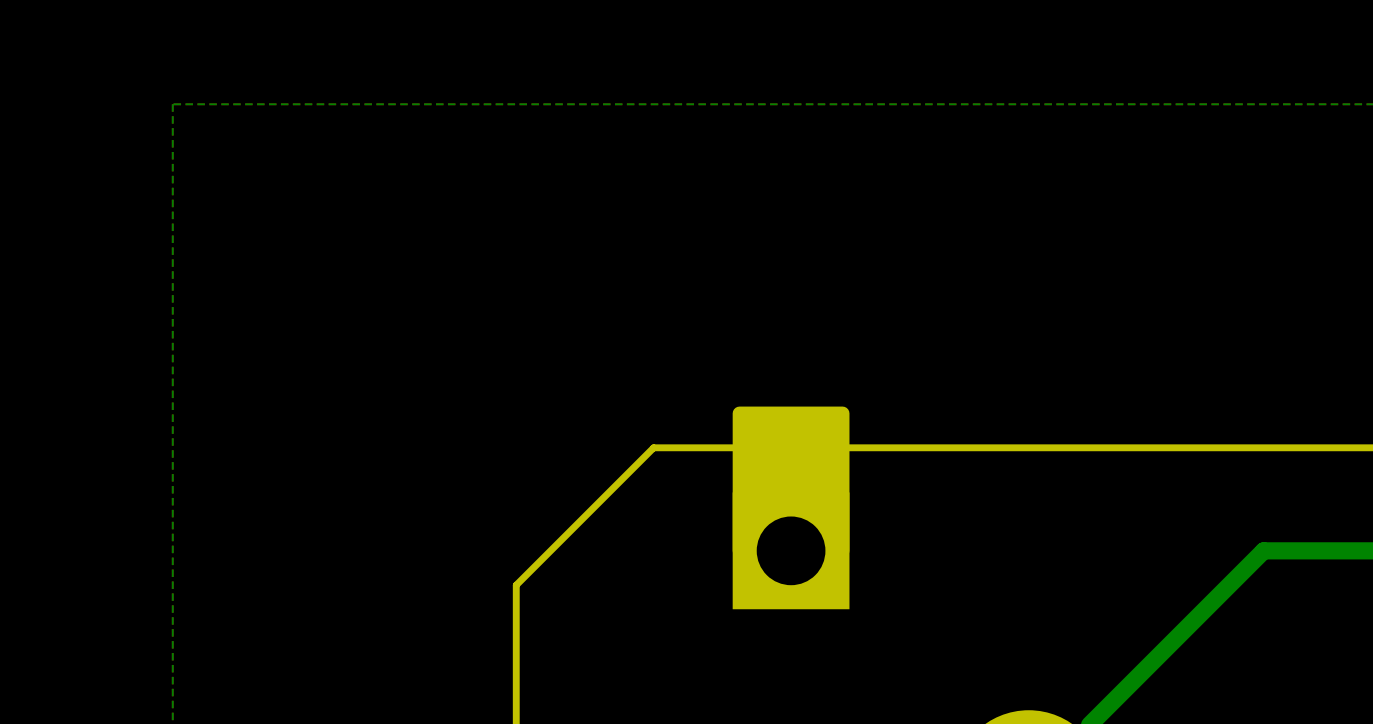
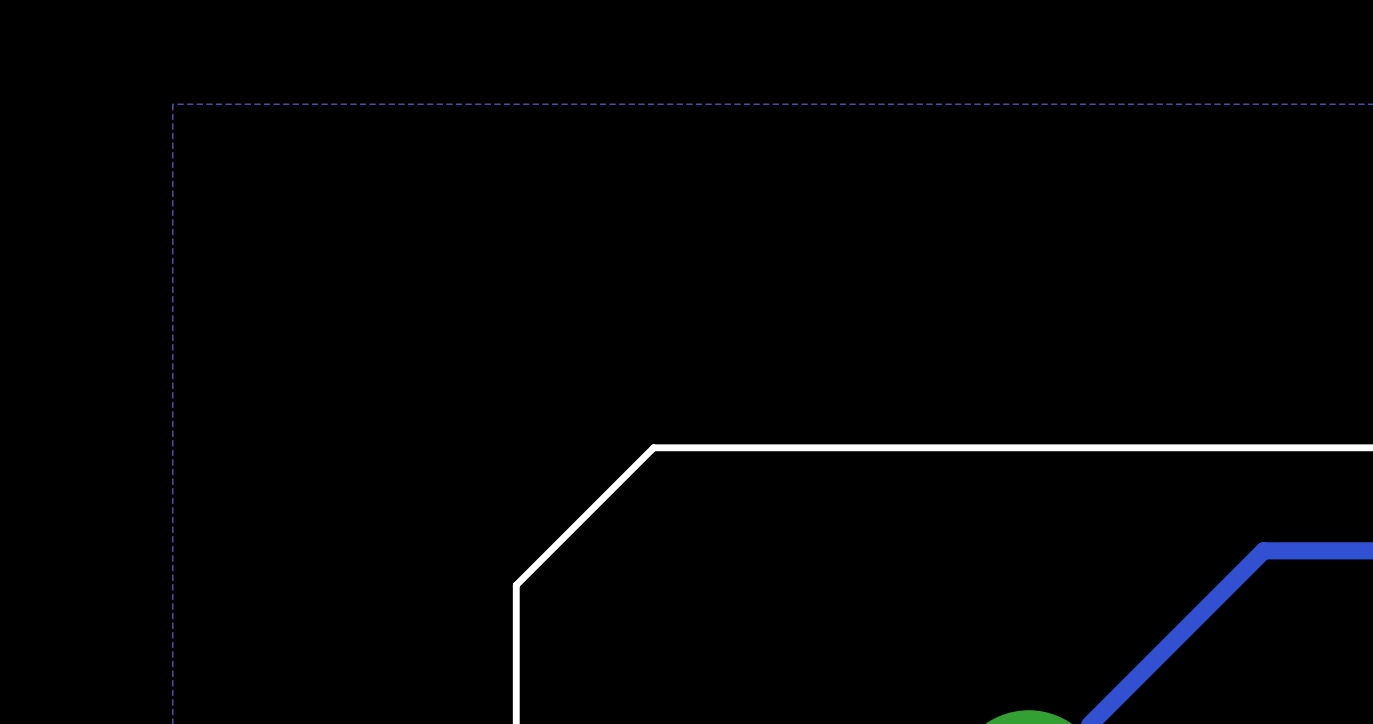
part: (791, 507) -> none

